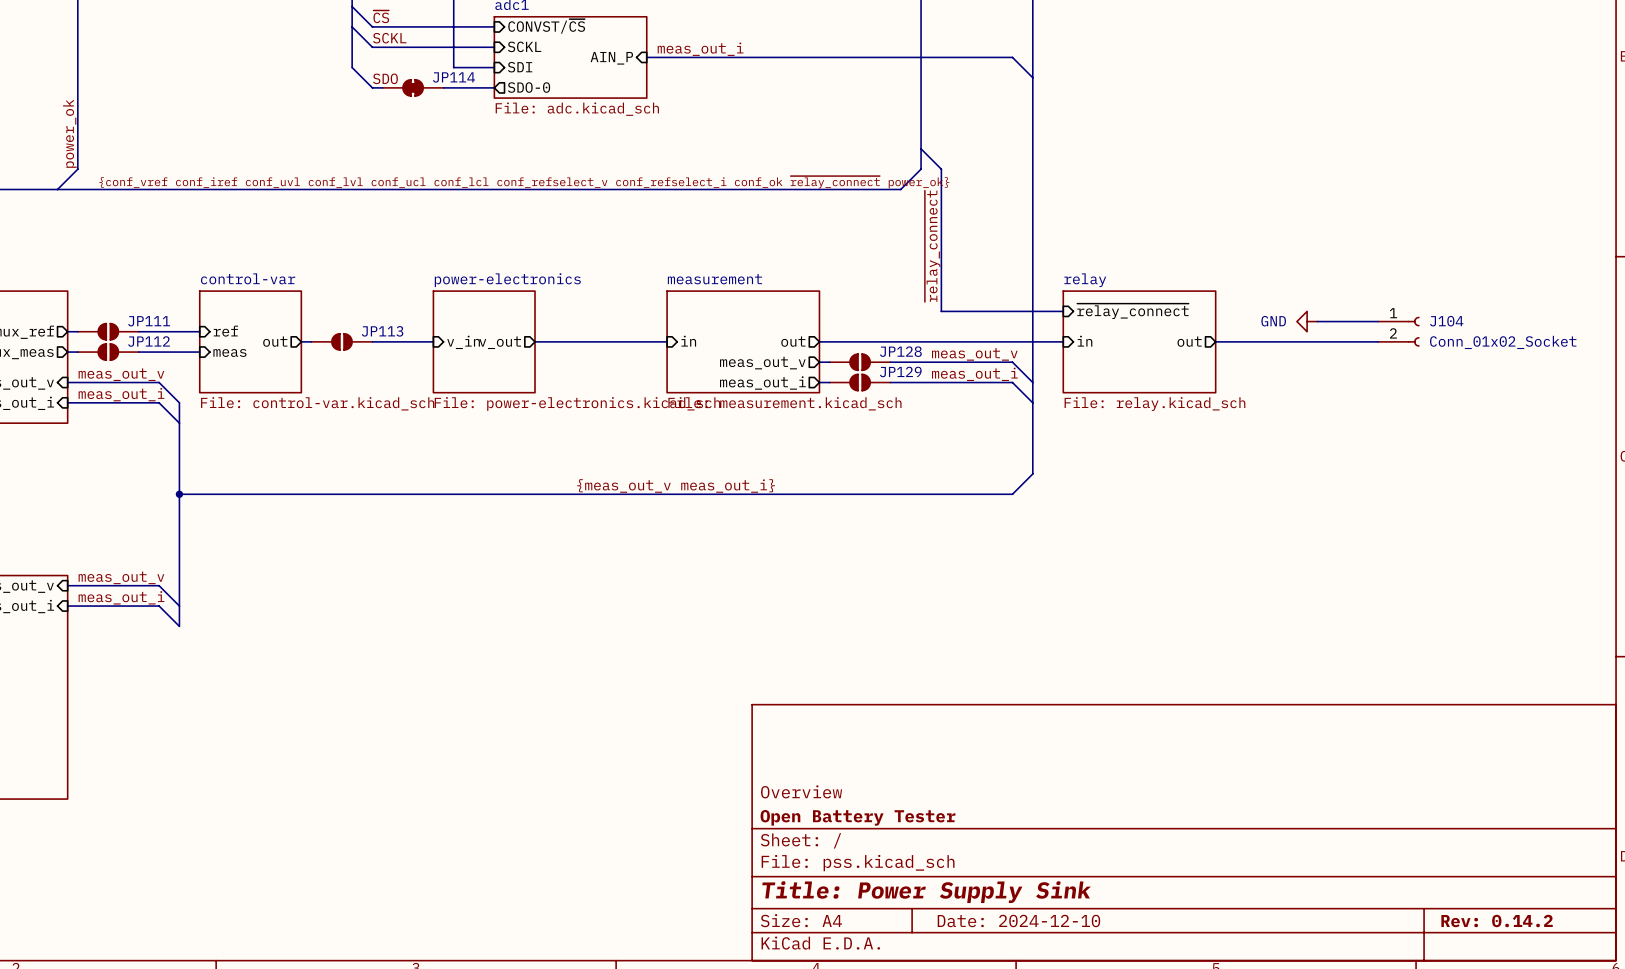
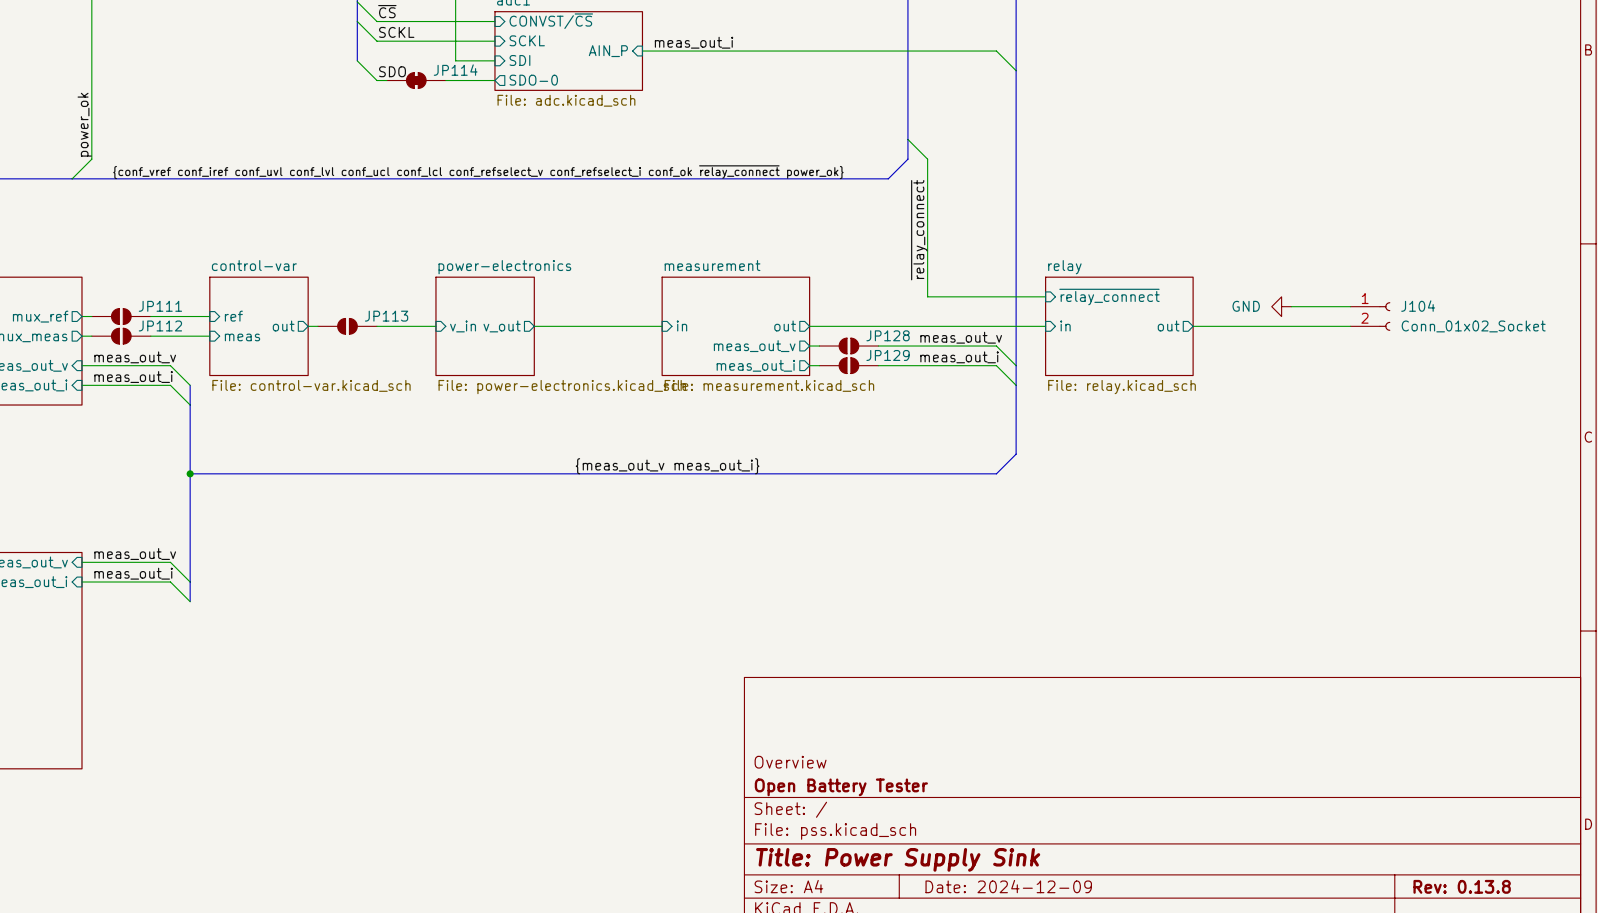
title block: Date: 2024-12-10 (1018, 920) -> Date: 2024-12-09 (1008, 886)
title block: Rev: 0.14.2 (1497, 920) -> Rev: 0.13.8 (1462, 886)

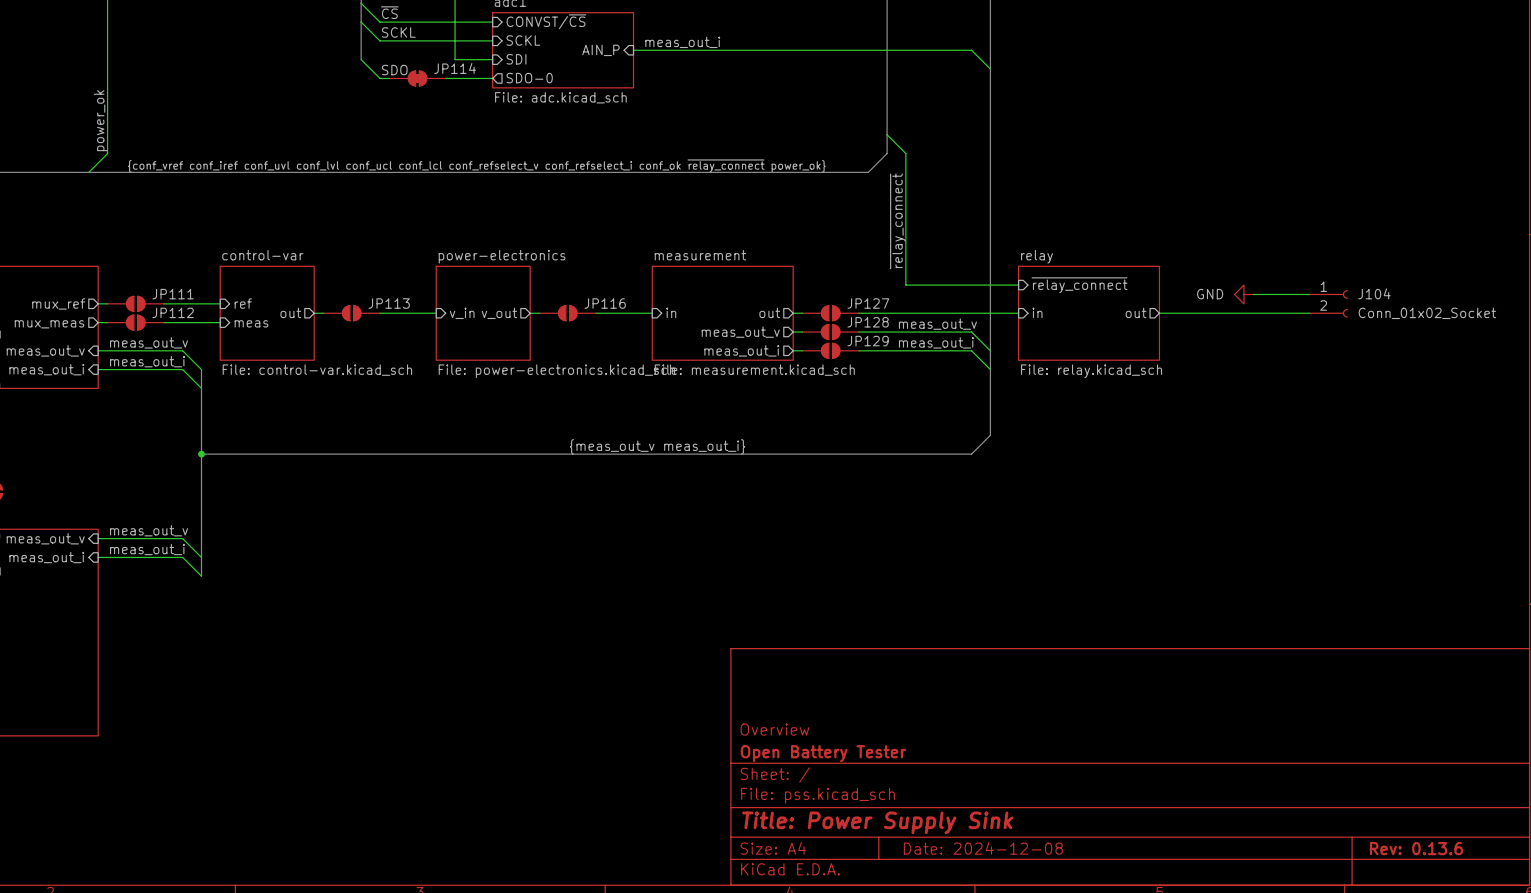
JP116: none -> (567, 313)
JP127: none -> (830, 313)
title block: Date: 2024-12-09 (1008, 886) -> Date: 2024-12-08 (983, 848)
title block: Rev: 0.13.8 (1462, 886) -> Rev: 0.13.6 (1416, 848)

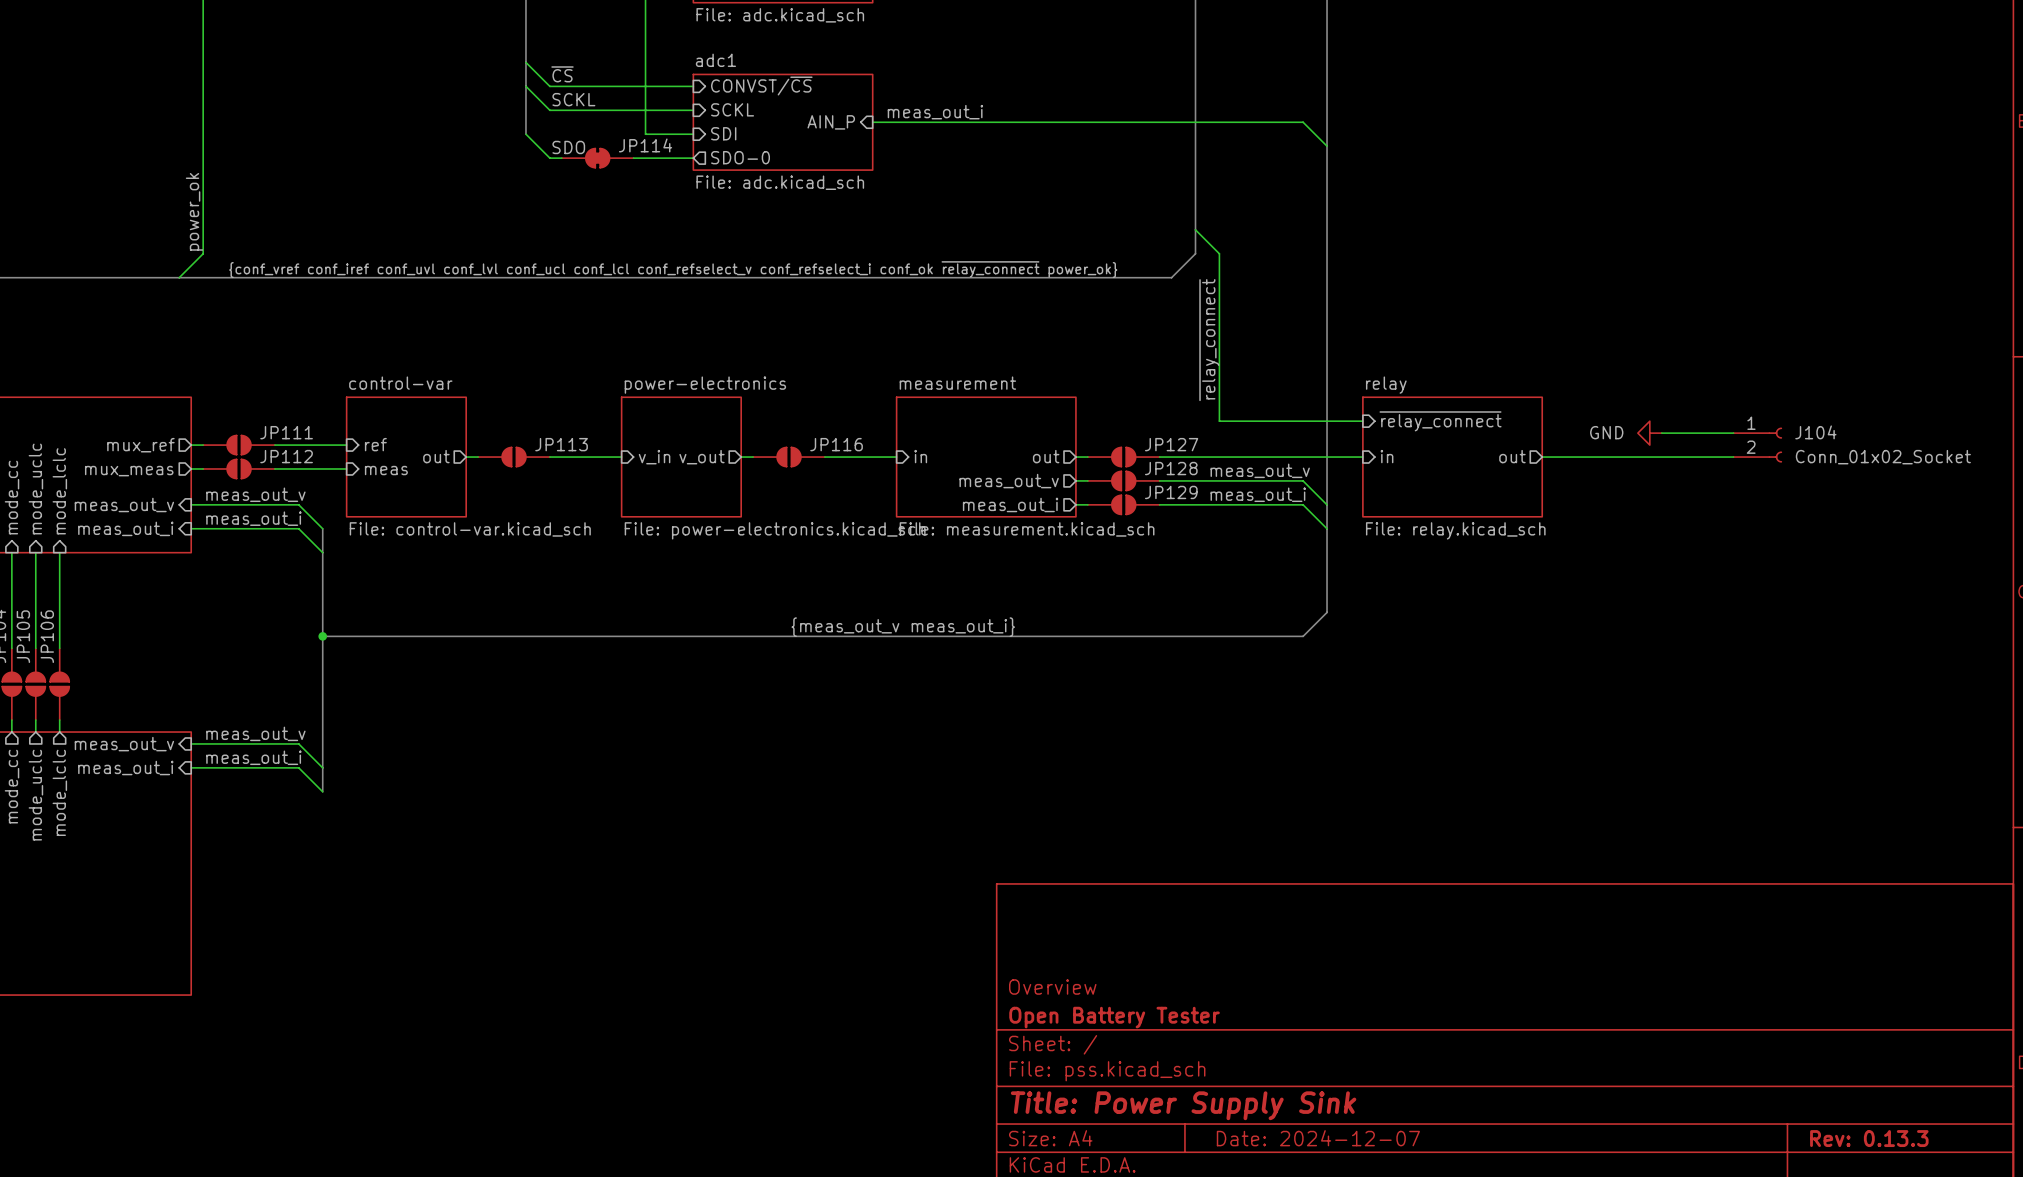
title block: Date: 2024-12-08 (983, 848) -> Date: 2024-12-07 (1318, 1138)
title block: Rev: 0.13.6 (1416, 848) -> Rev: 0.13.3 (1869, 1138)

